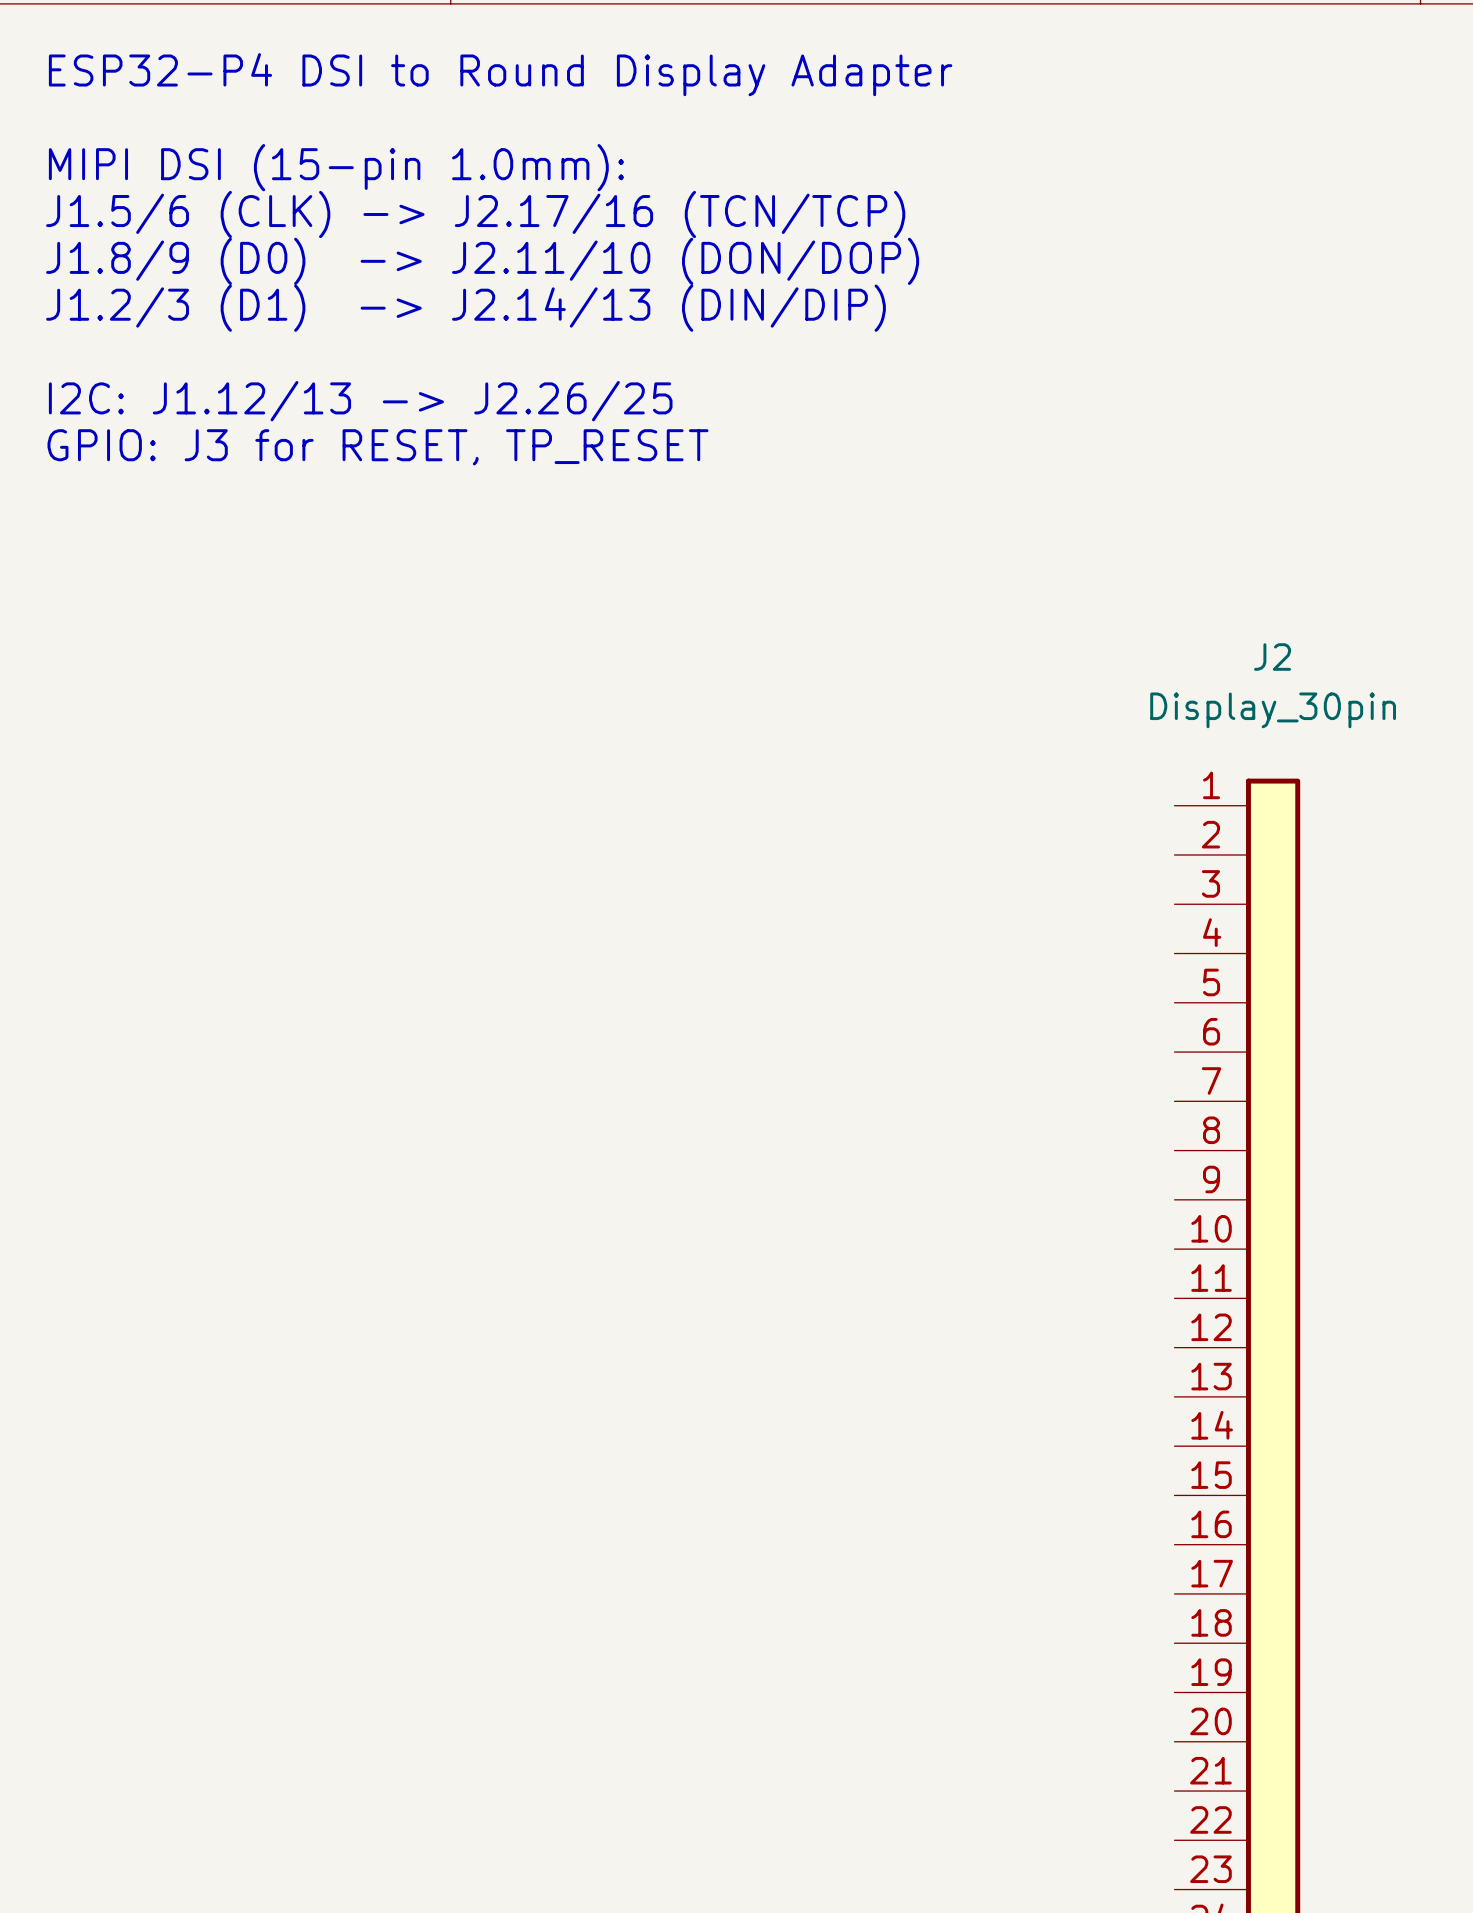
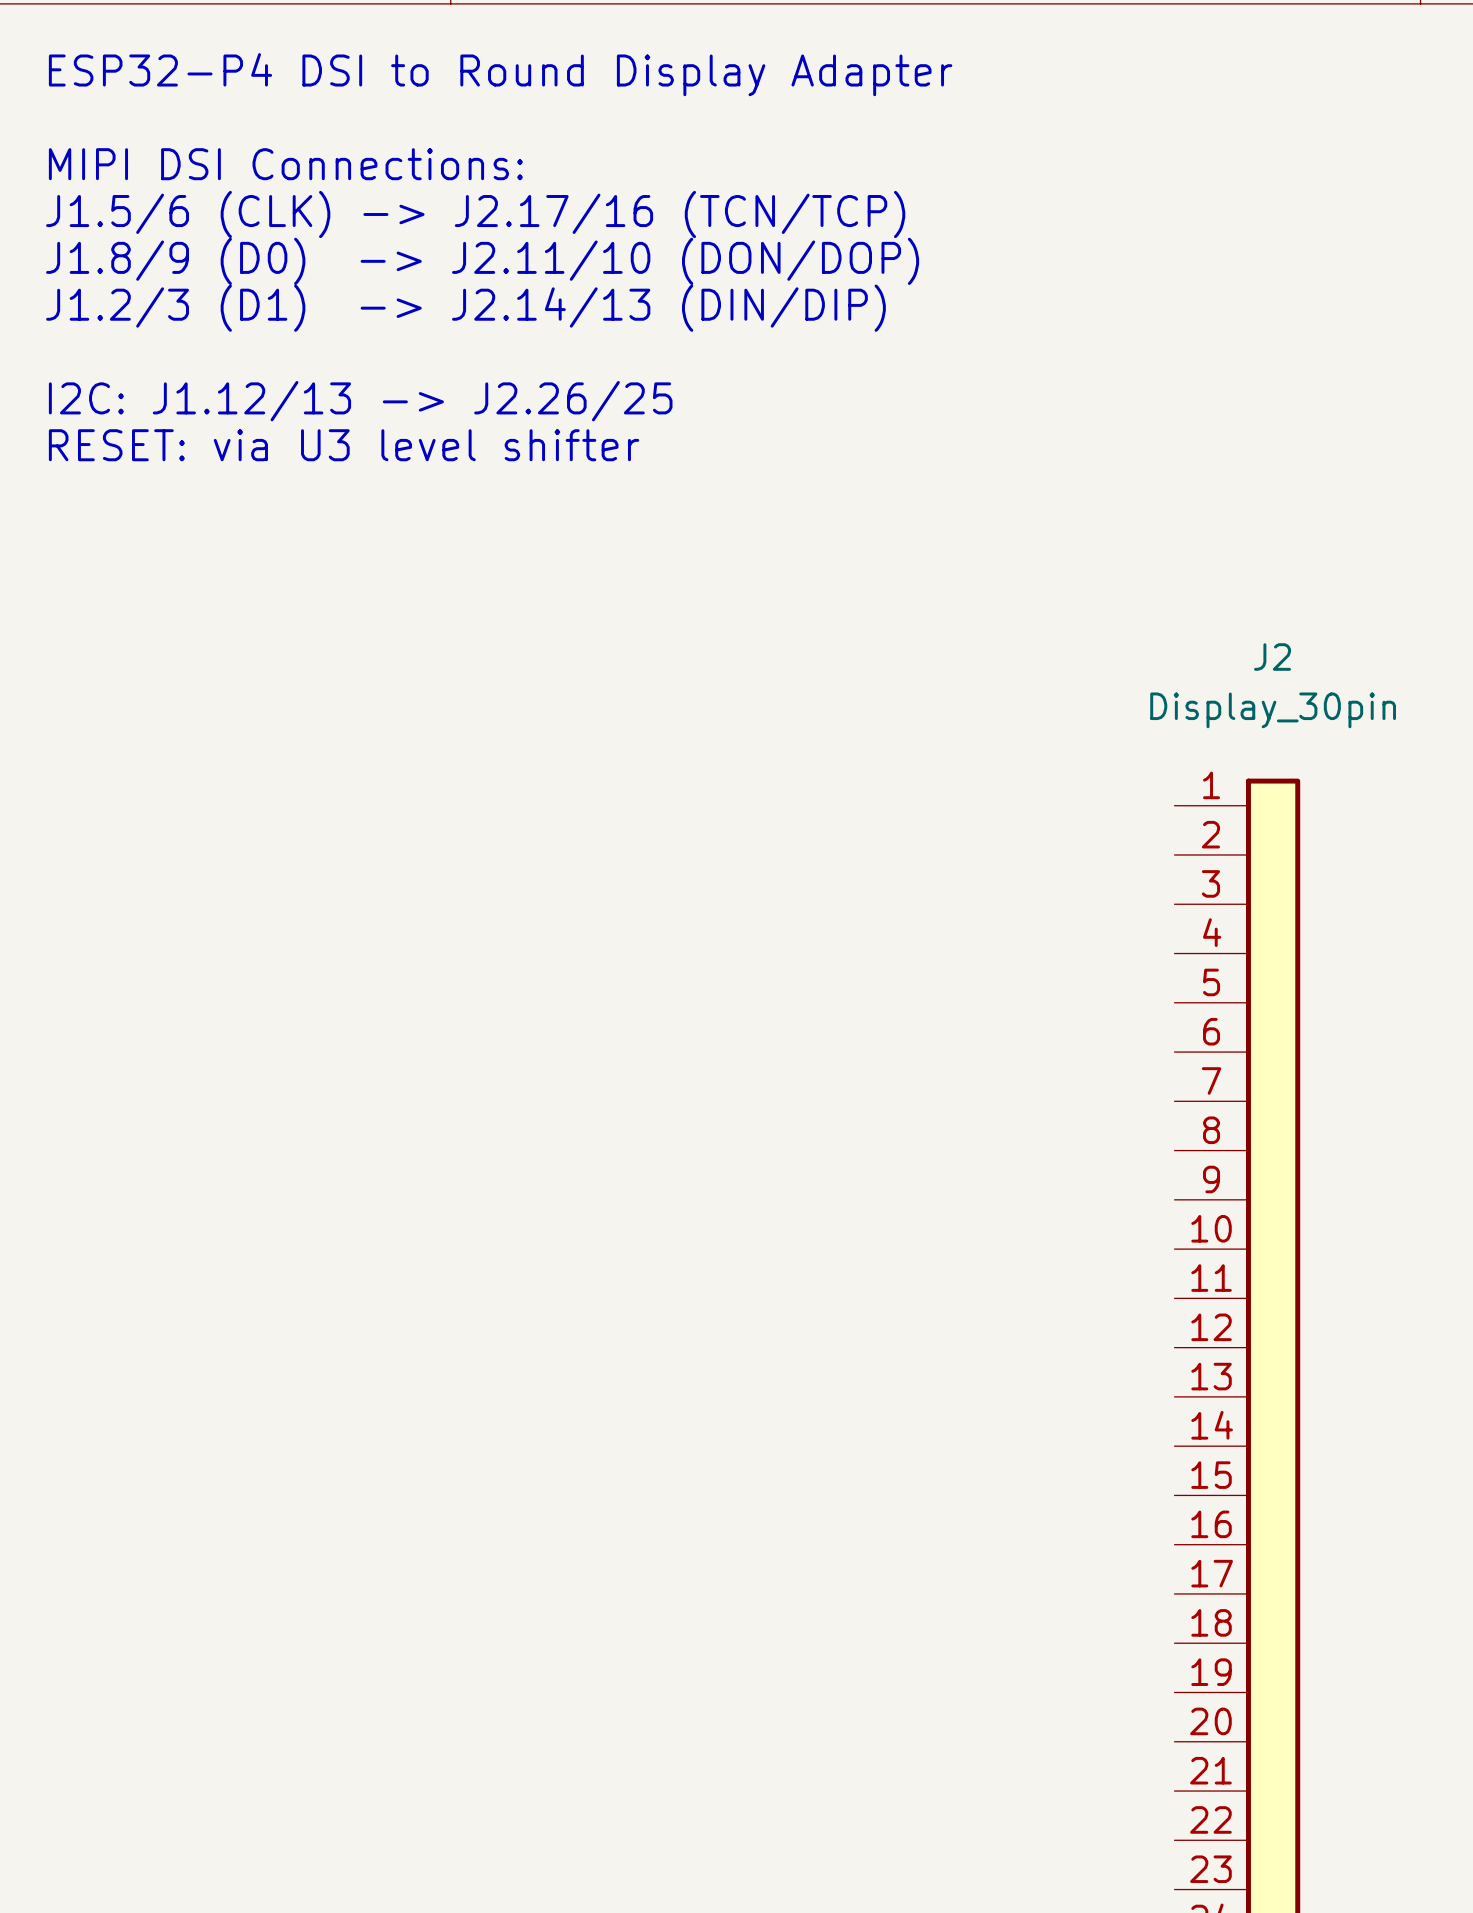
text: MIPI DSI (15-pin 1.0mm): (336, 167) -> MIPI DSI Connections: (285, 164)
text: GPIO: J3 for RESET, TP_RESET (378, 447) -> RESET: via U3 level shifter (344, 445)

